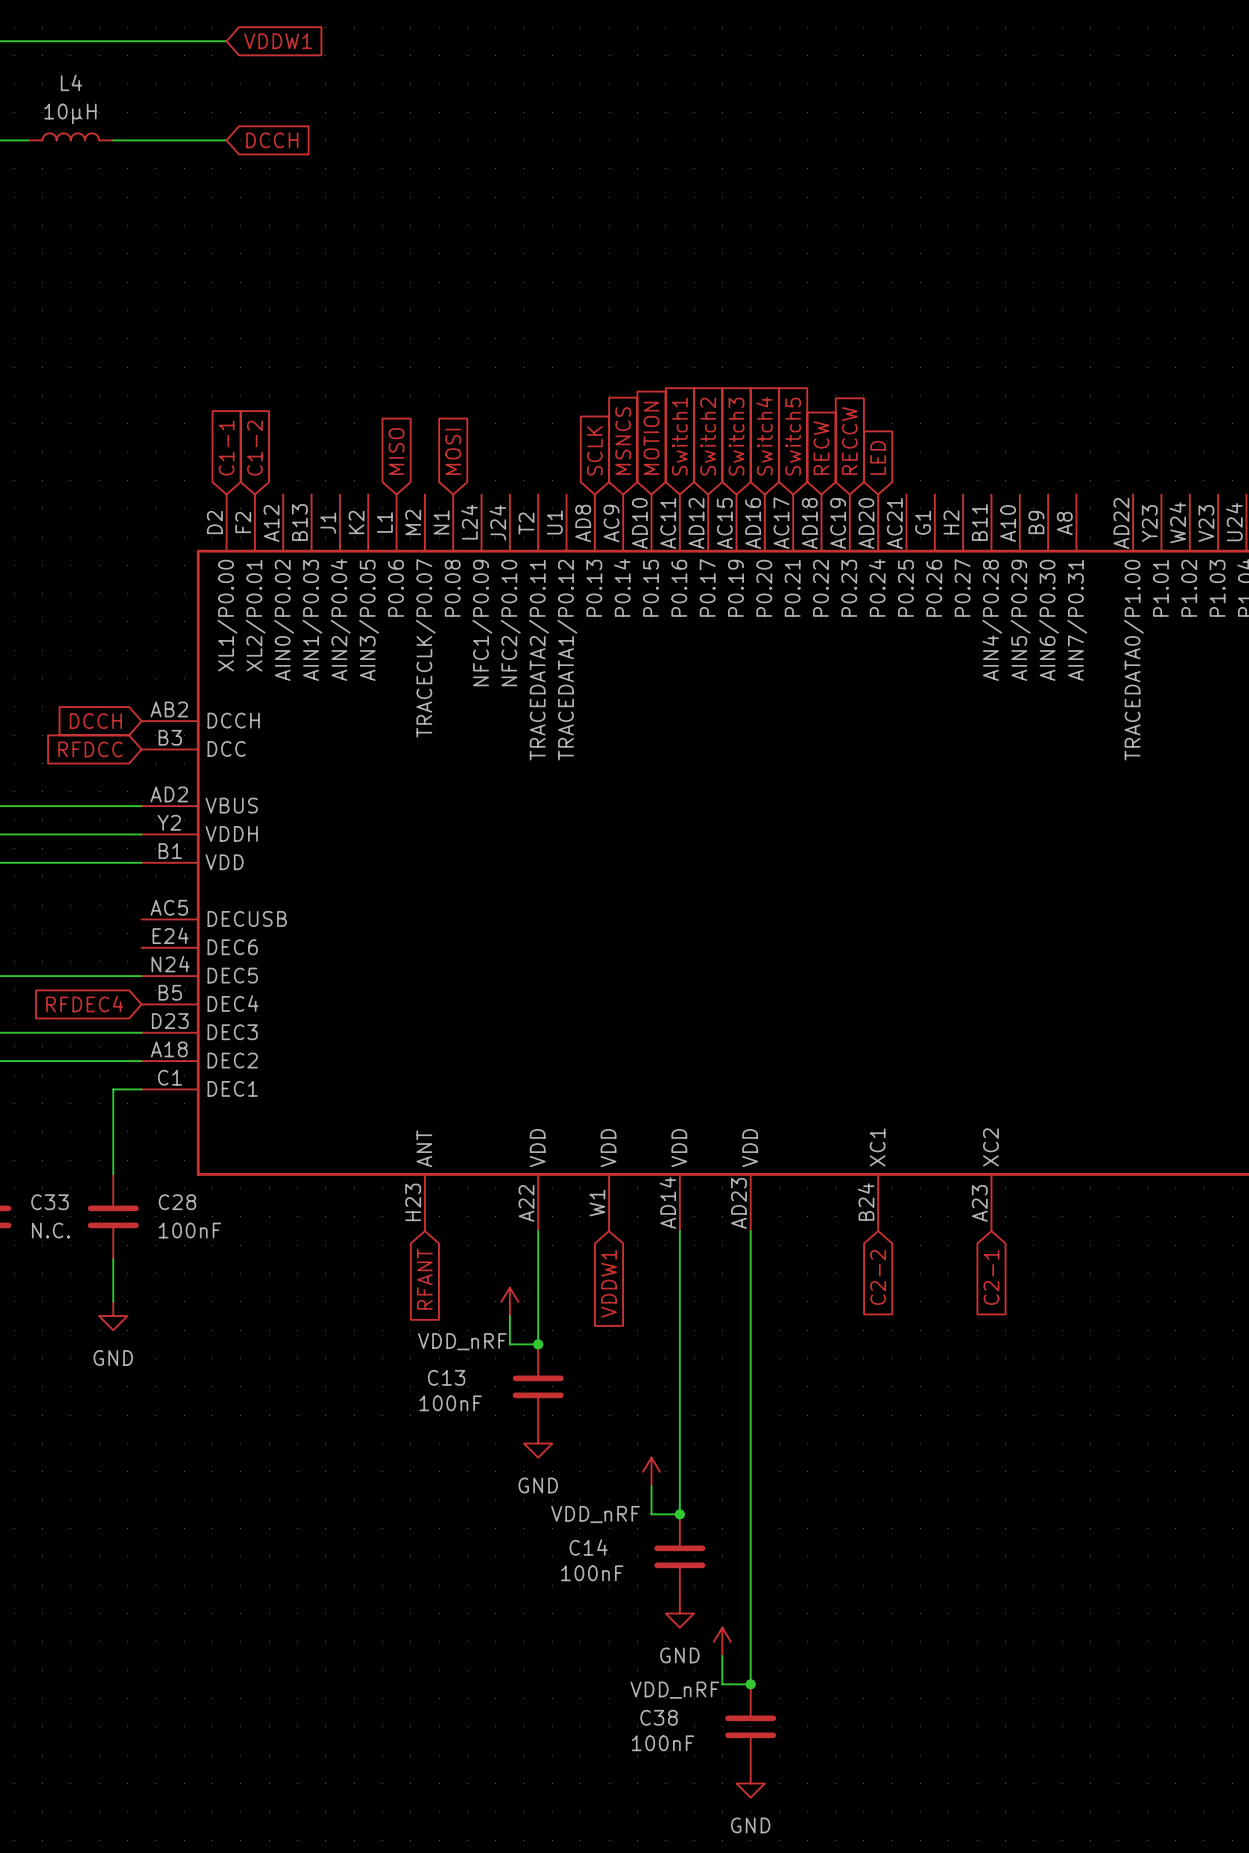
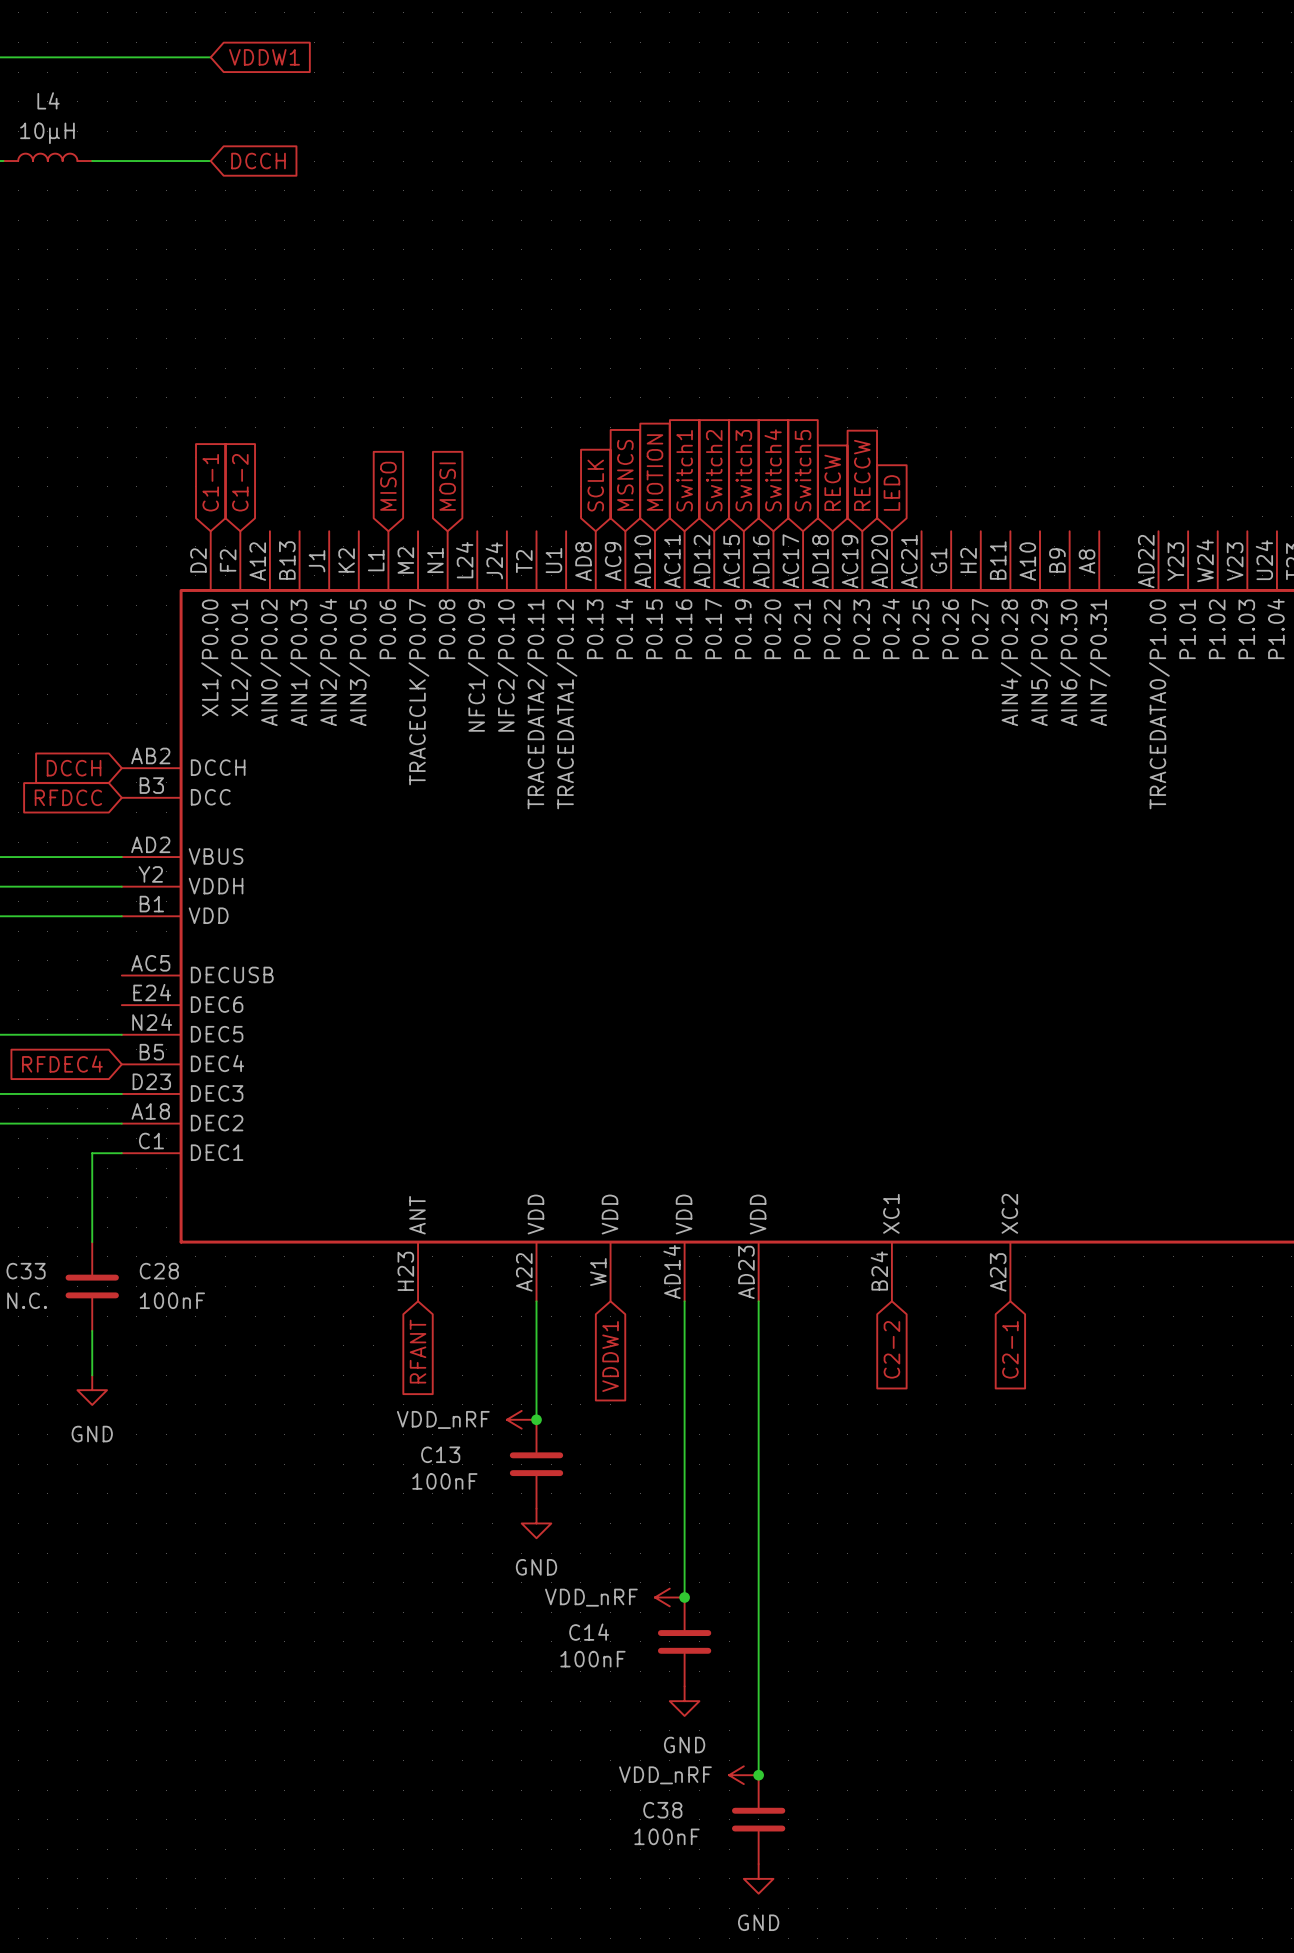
power symbol rotation: 0° (509, 1301) -> 90° counterclockwise (521, 1419)
power symbol position: VDD_nRF (509, 1301) -> VDD_nRF (521, 1419)
wire: (509, 1316) (509, 1344) (538, 1344) -> none
power symbol text position: VDD_nRF (462, 1341) -> VDD_nRF (443, 1419)
power symbol rotation: 0° (651, 1471) -> 90° counterclockwise (669, 1597)
power symbol position: VDD_nRF (651, 1471) -> VDD_nRF (669, 1597)
wire: (651, 1486) (651, 1514) (679, 1514) -> none
power symbol text position: VDD_nRF (595, 1514) -> VDD_nRF (591, 1597)
power symbol rotation: 0° (722, 1641) -> 90° counterclockwise (743, 1775)
power symbol position: VDD_nRF (722, 1641) -> VDD_nRF (743, 1775)
wire: (722, 1656) (722, 1684) (750, 1684) -> none
power symbol text position: VDD_nRF (674, 1690) -> VDD_nRF (665, 1775)

